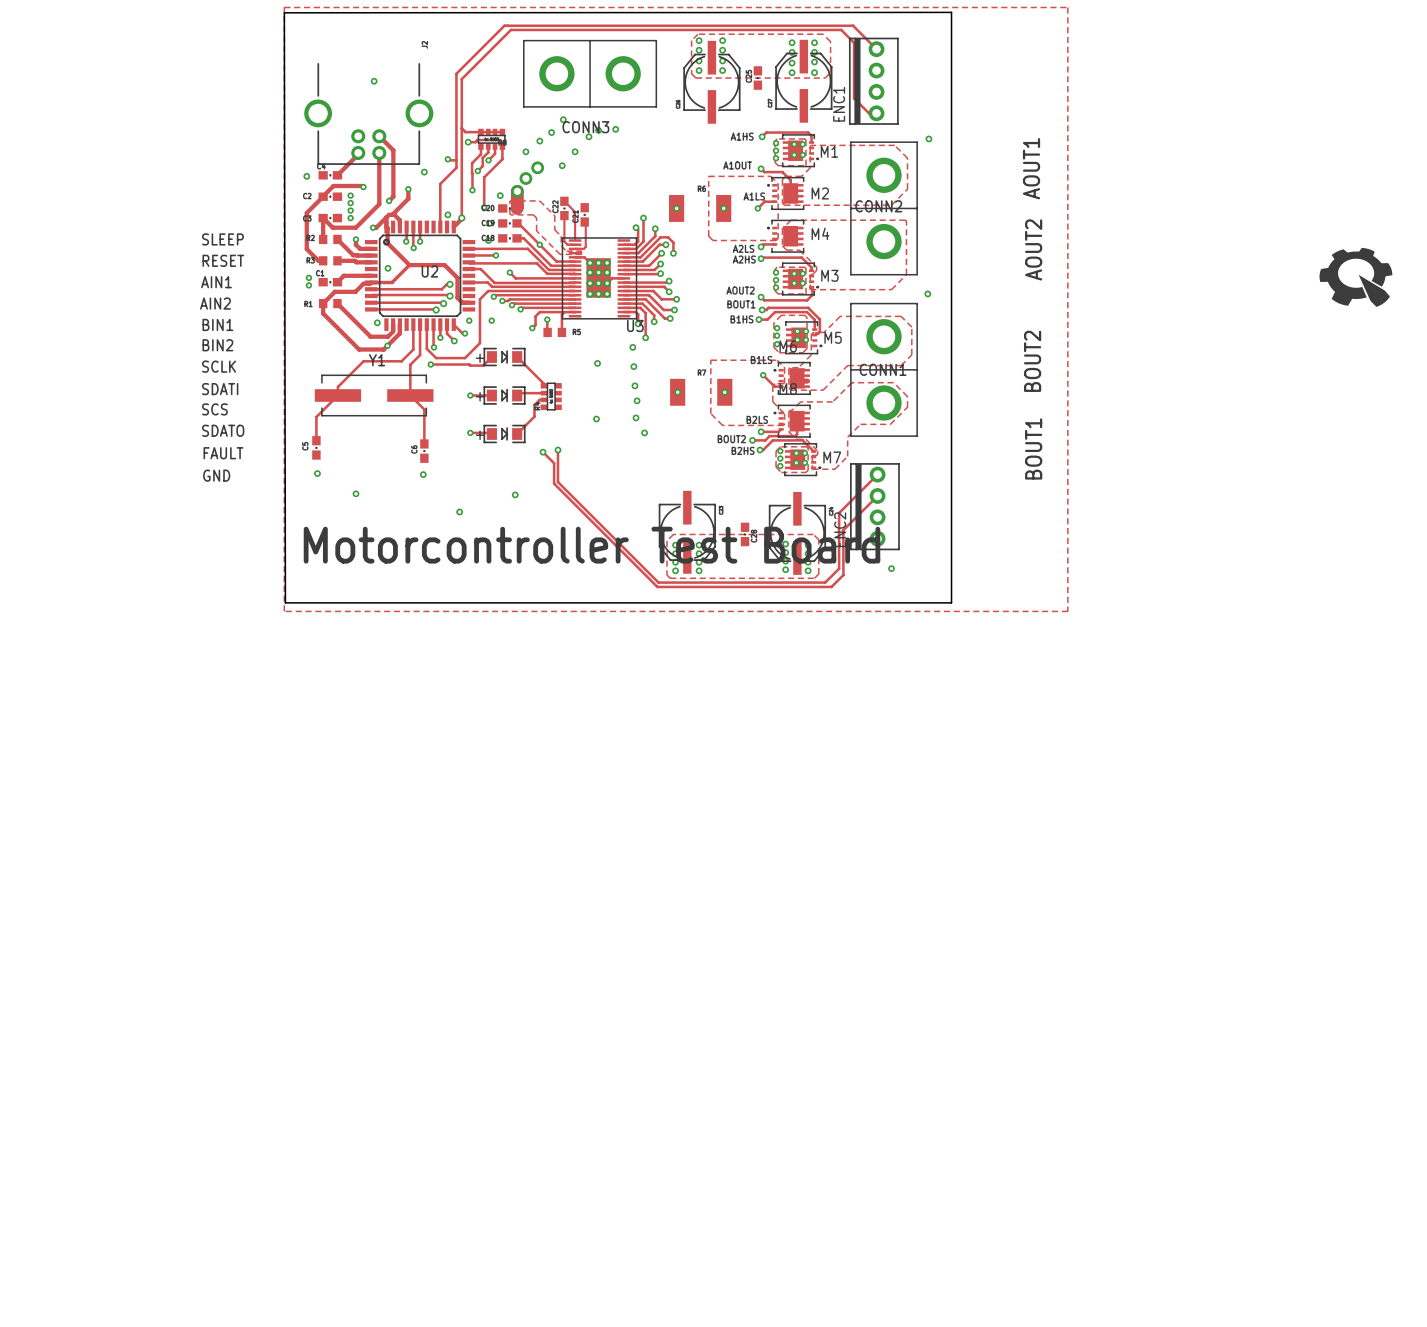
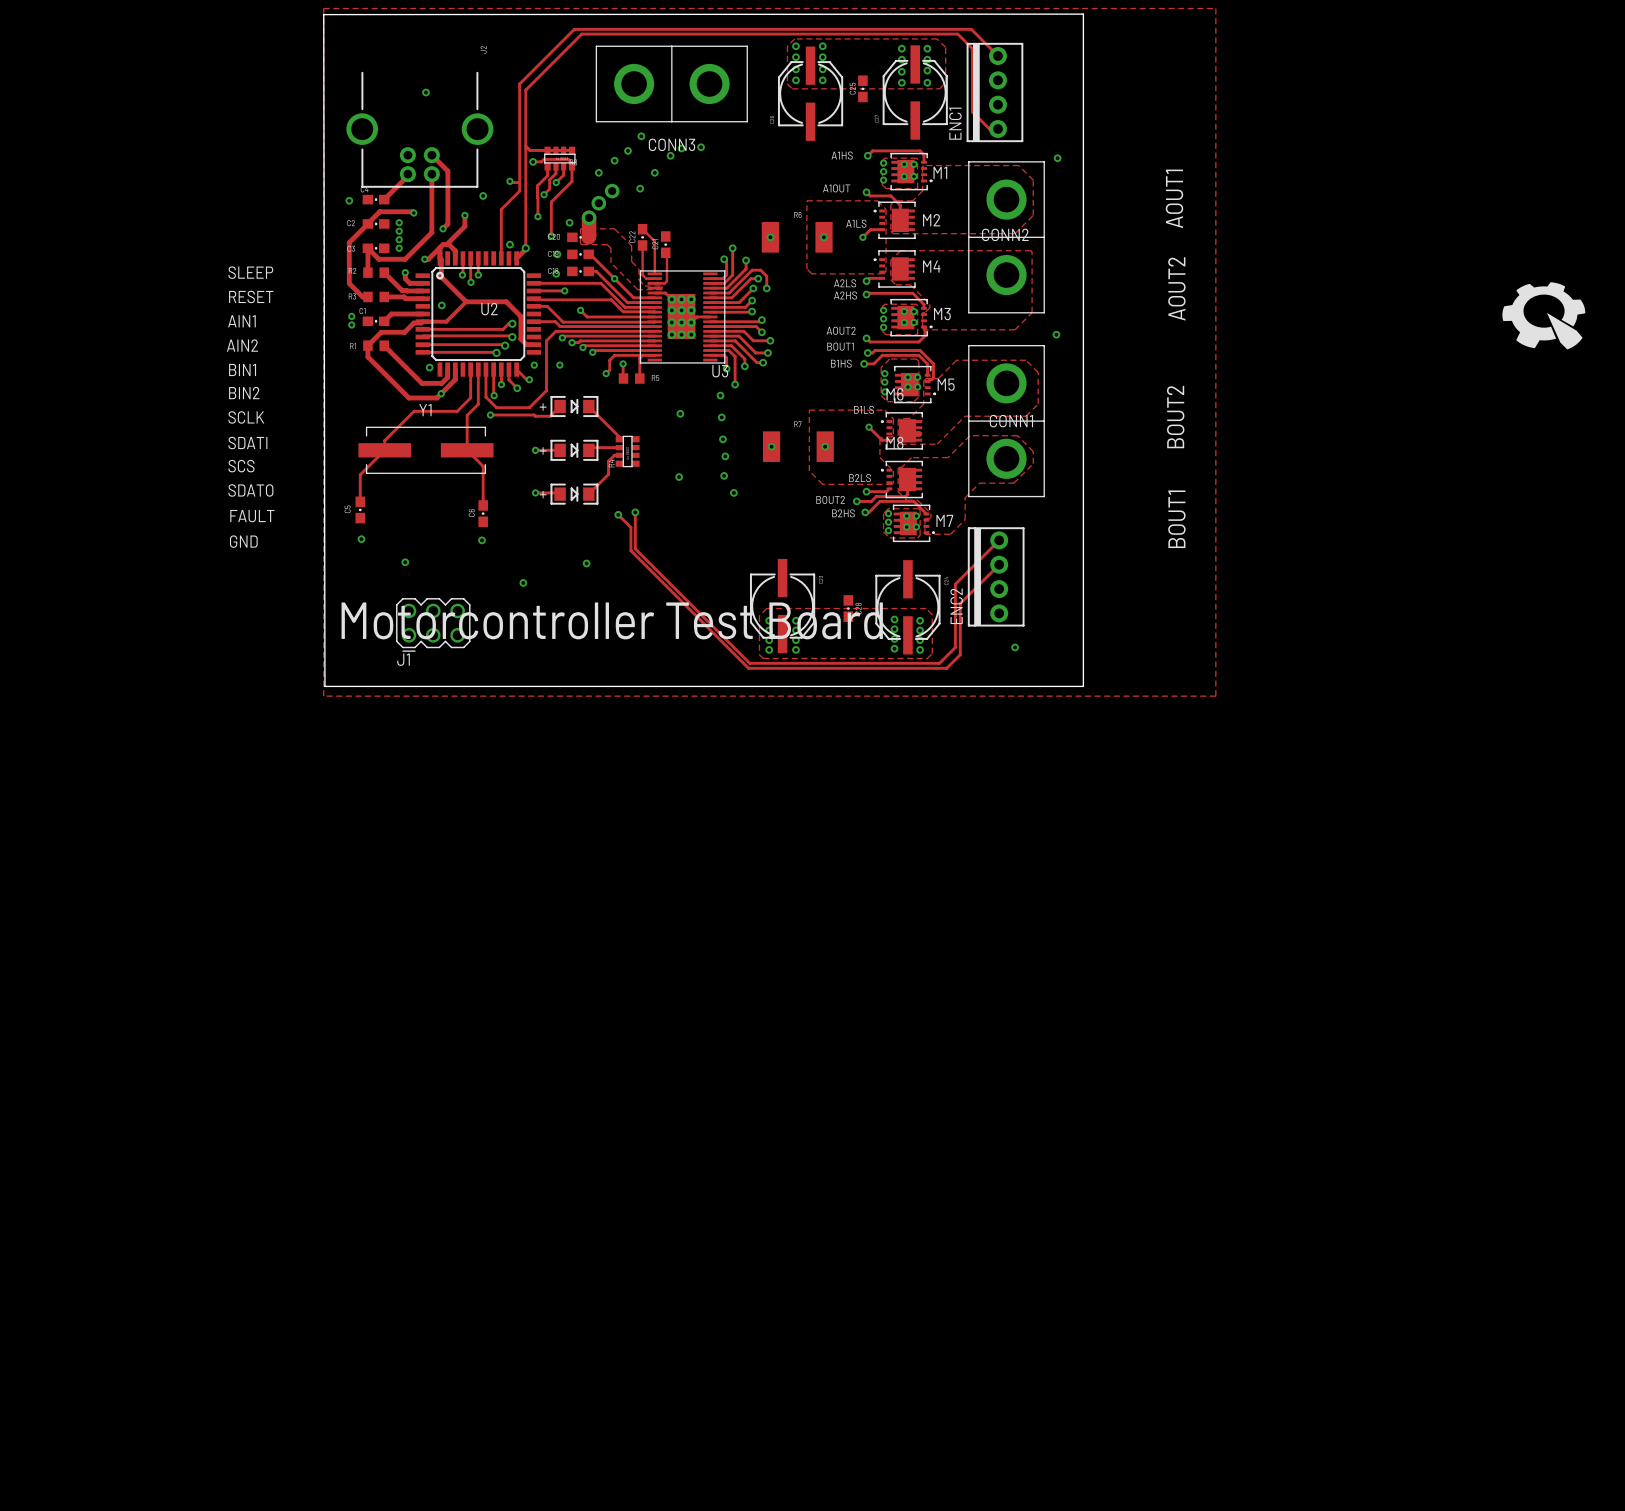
J1: none -> (433, 624)

